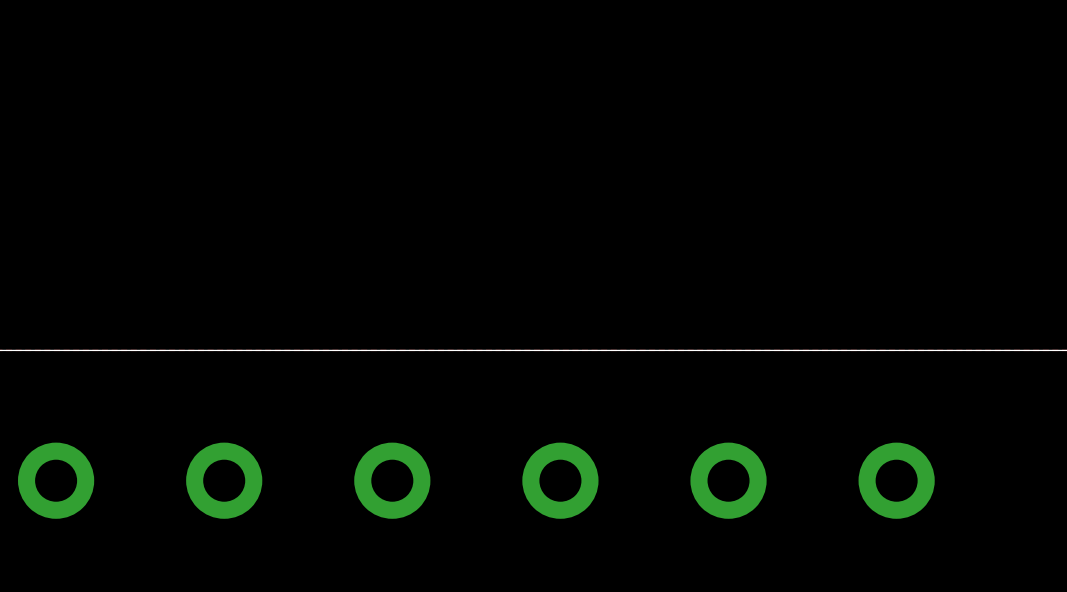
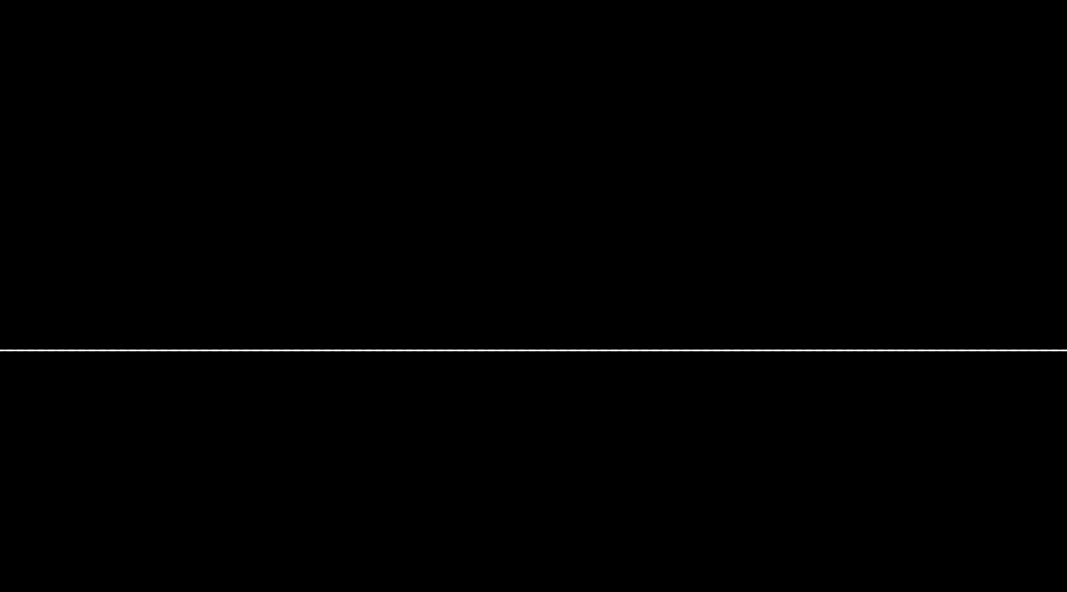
via: (56, 480) -> none
via: (224, 480) -> none
via: (392, 480) -> none
via: (560, 480) -> none
via: (728, 480) -> none
via: (896, 480) -> none

